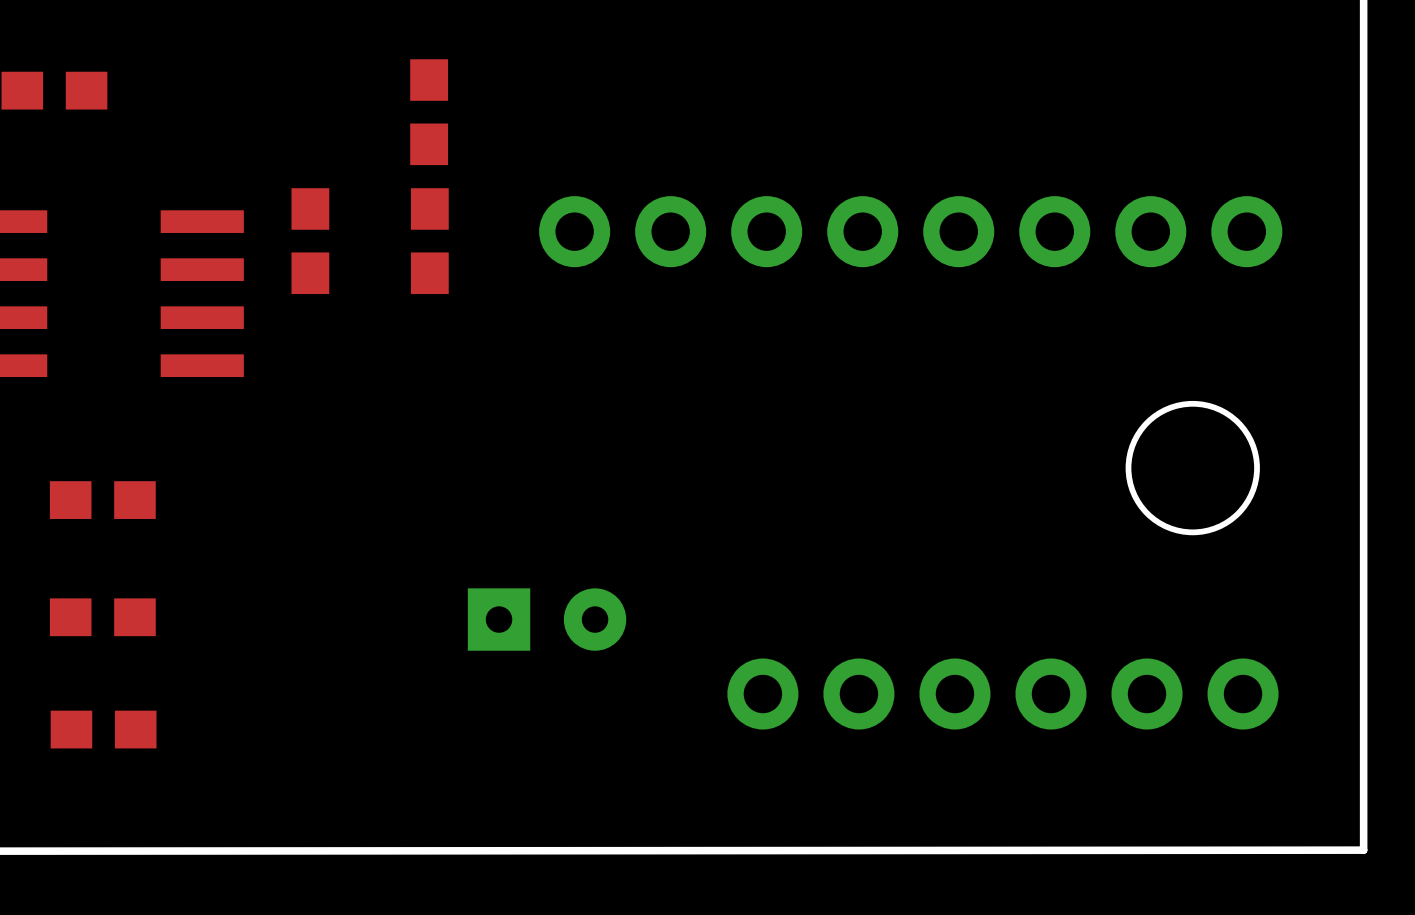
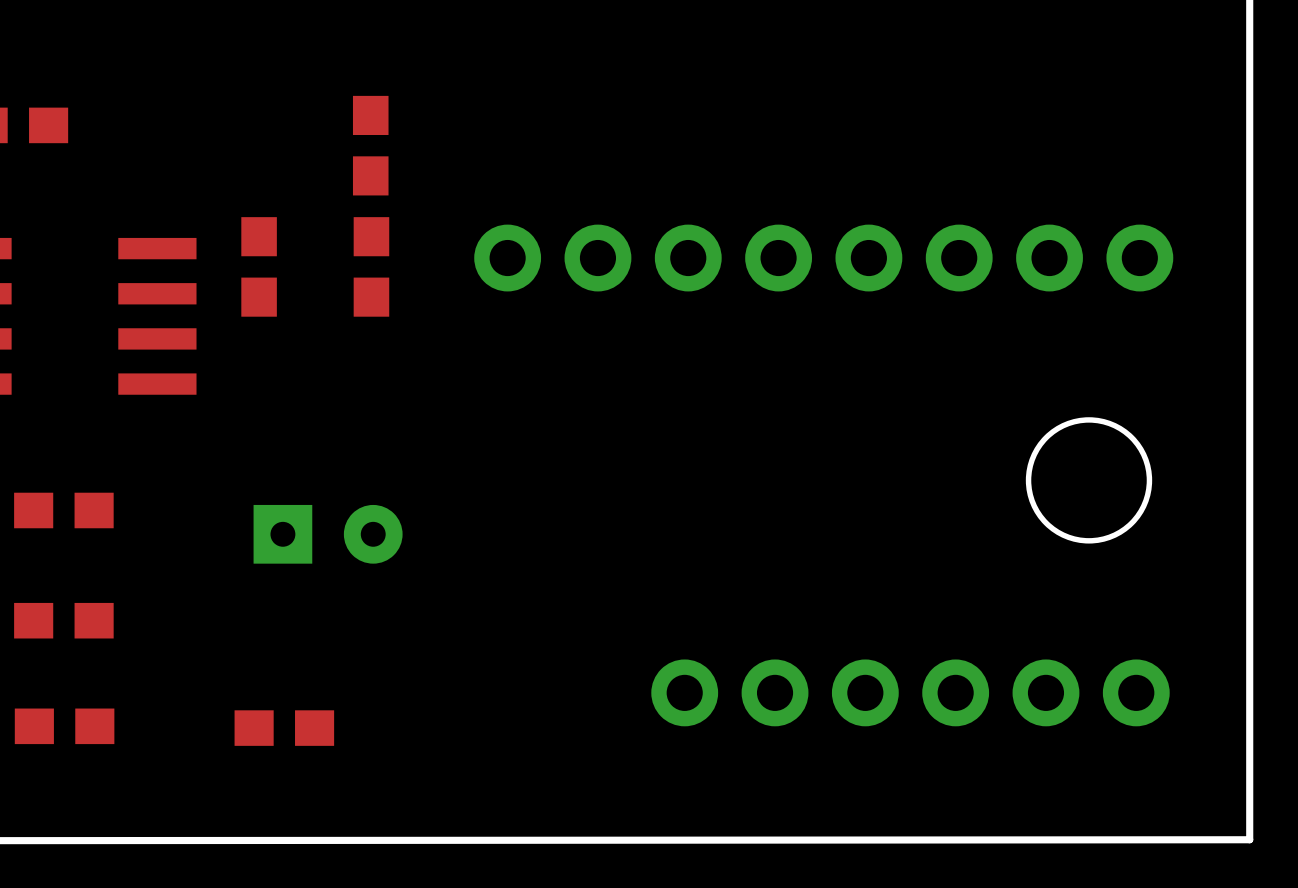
part position: (547, 619) -> (328, 534)
part: none -> (284, 728)

